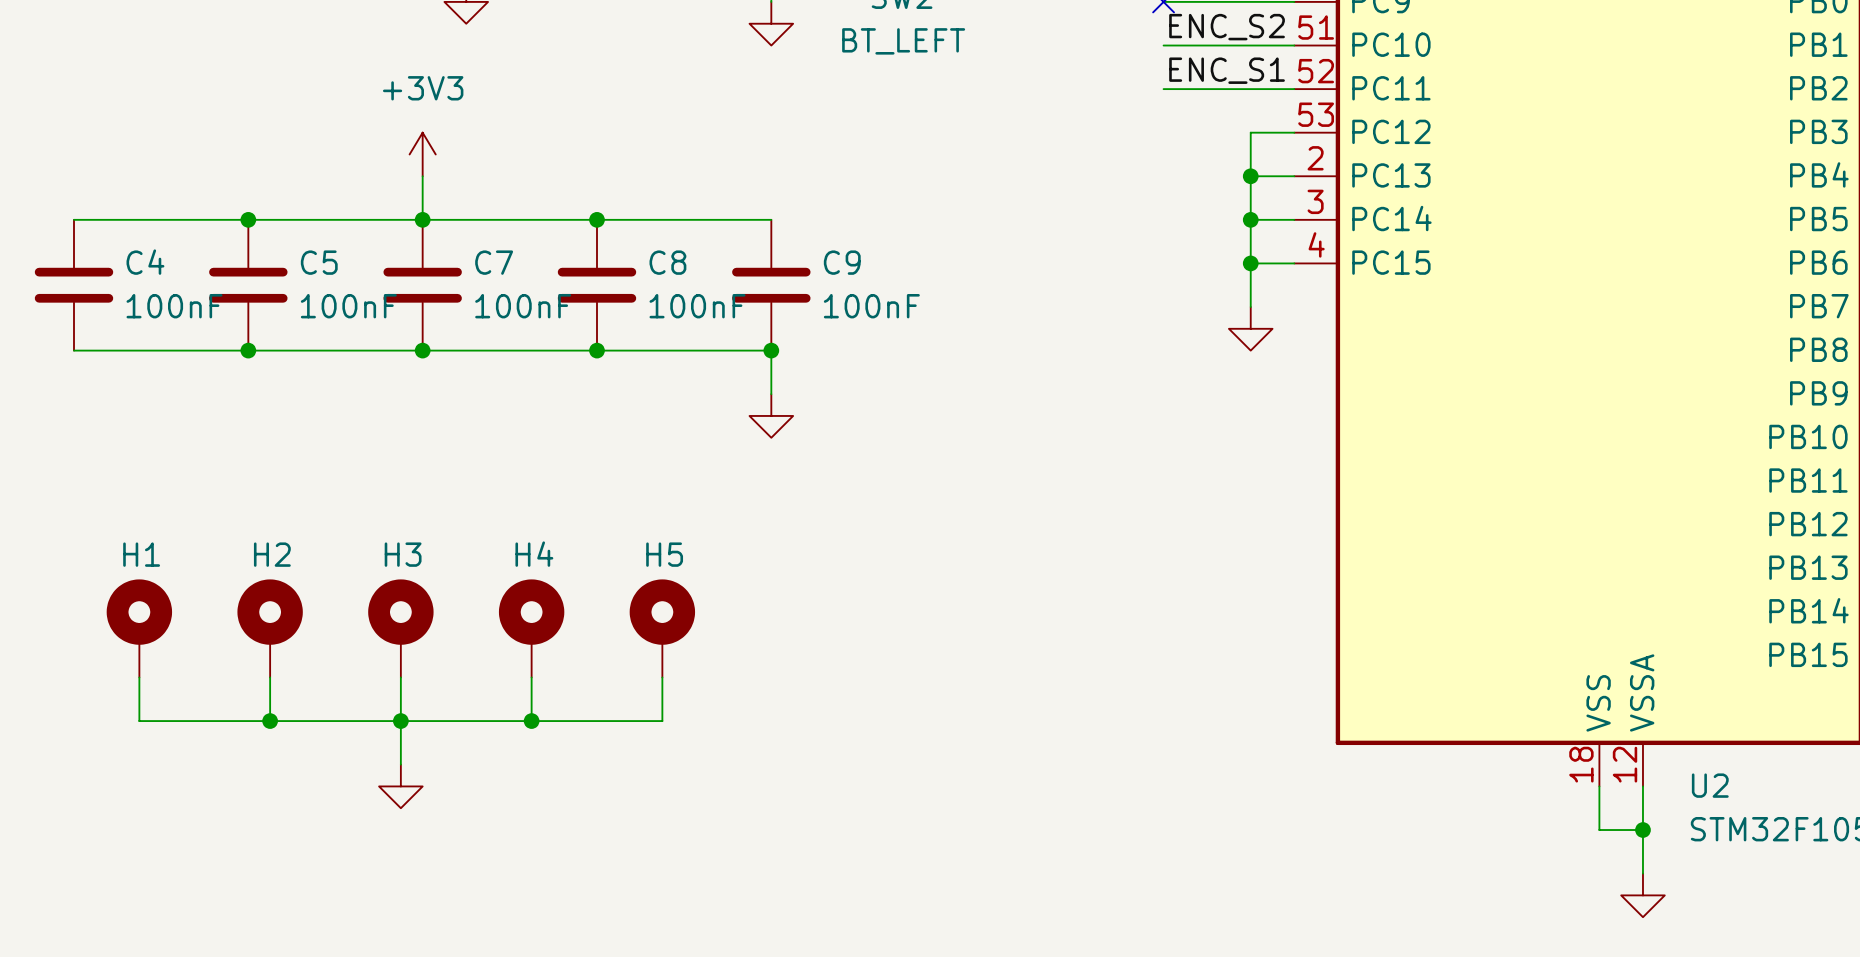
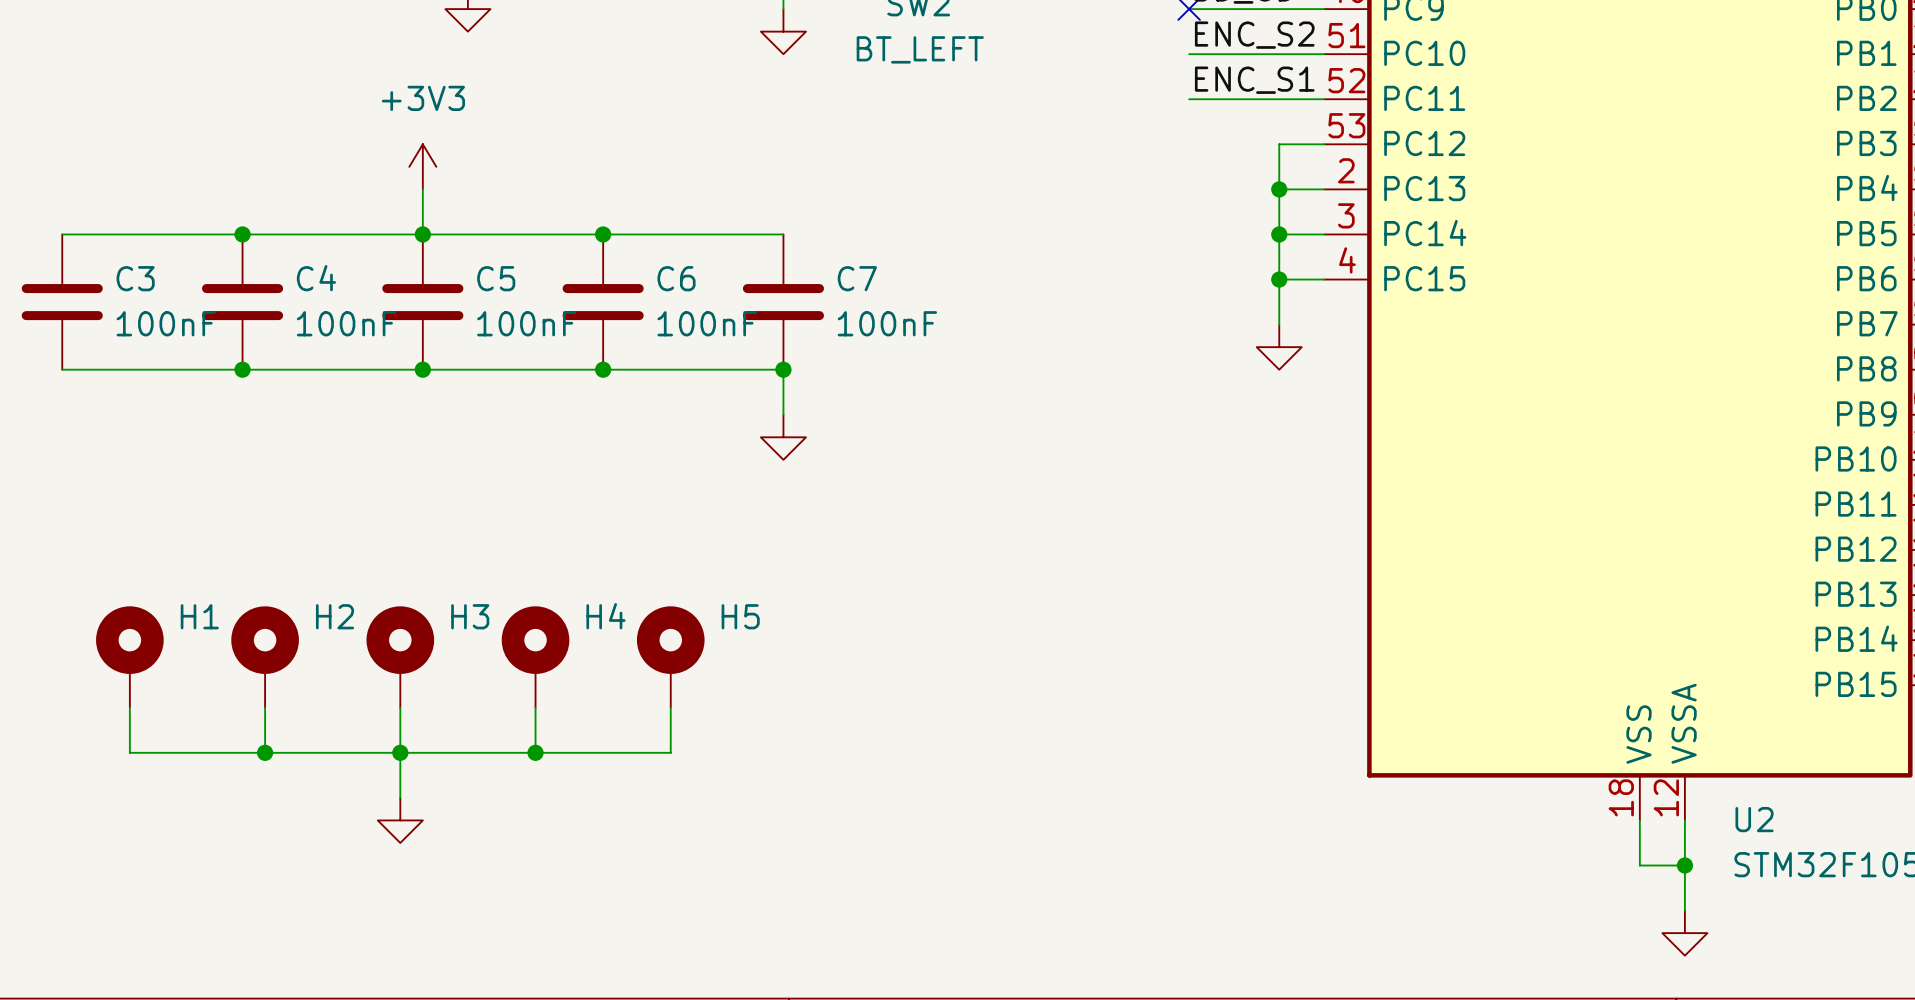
C4 name: C4 (145, 262) -> C3 (135, 278)
C5 name: C5 (319, 262) -> C4 (316, 278)
C7 name: C7 (494, 262) -> C5 (496, 278)
C8 name: C8 (667, 262) -> C6 (676, 278)
C9 name: C9 (842, 262) -> C7 (857, 278)
H1 name position: H1 (141, 554) -> H1 (199, 616)
H2 name position: H2 (272, 554) -> H2 (335, 616)
H3 name position: H3 (403, 554) -> H3 (470, 616)
H4 name position: H4 (534, 554) -> H4 (606, 616)
H5 name position: H5 (664, 554) -> H5 (740, 616)

